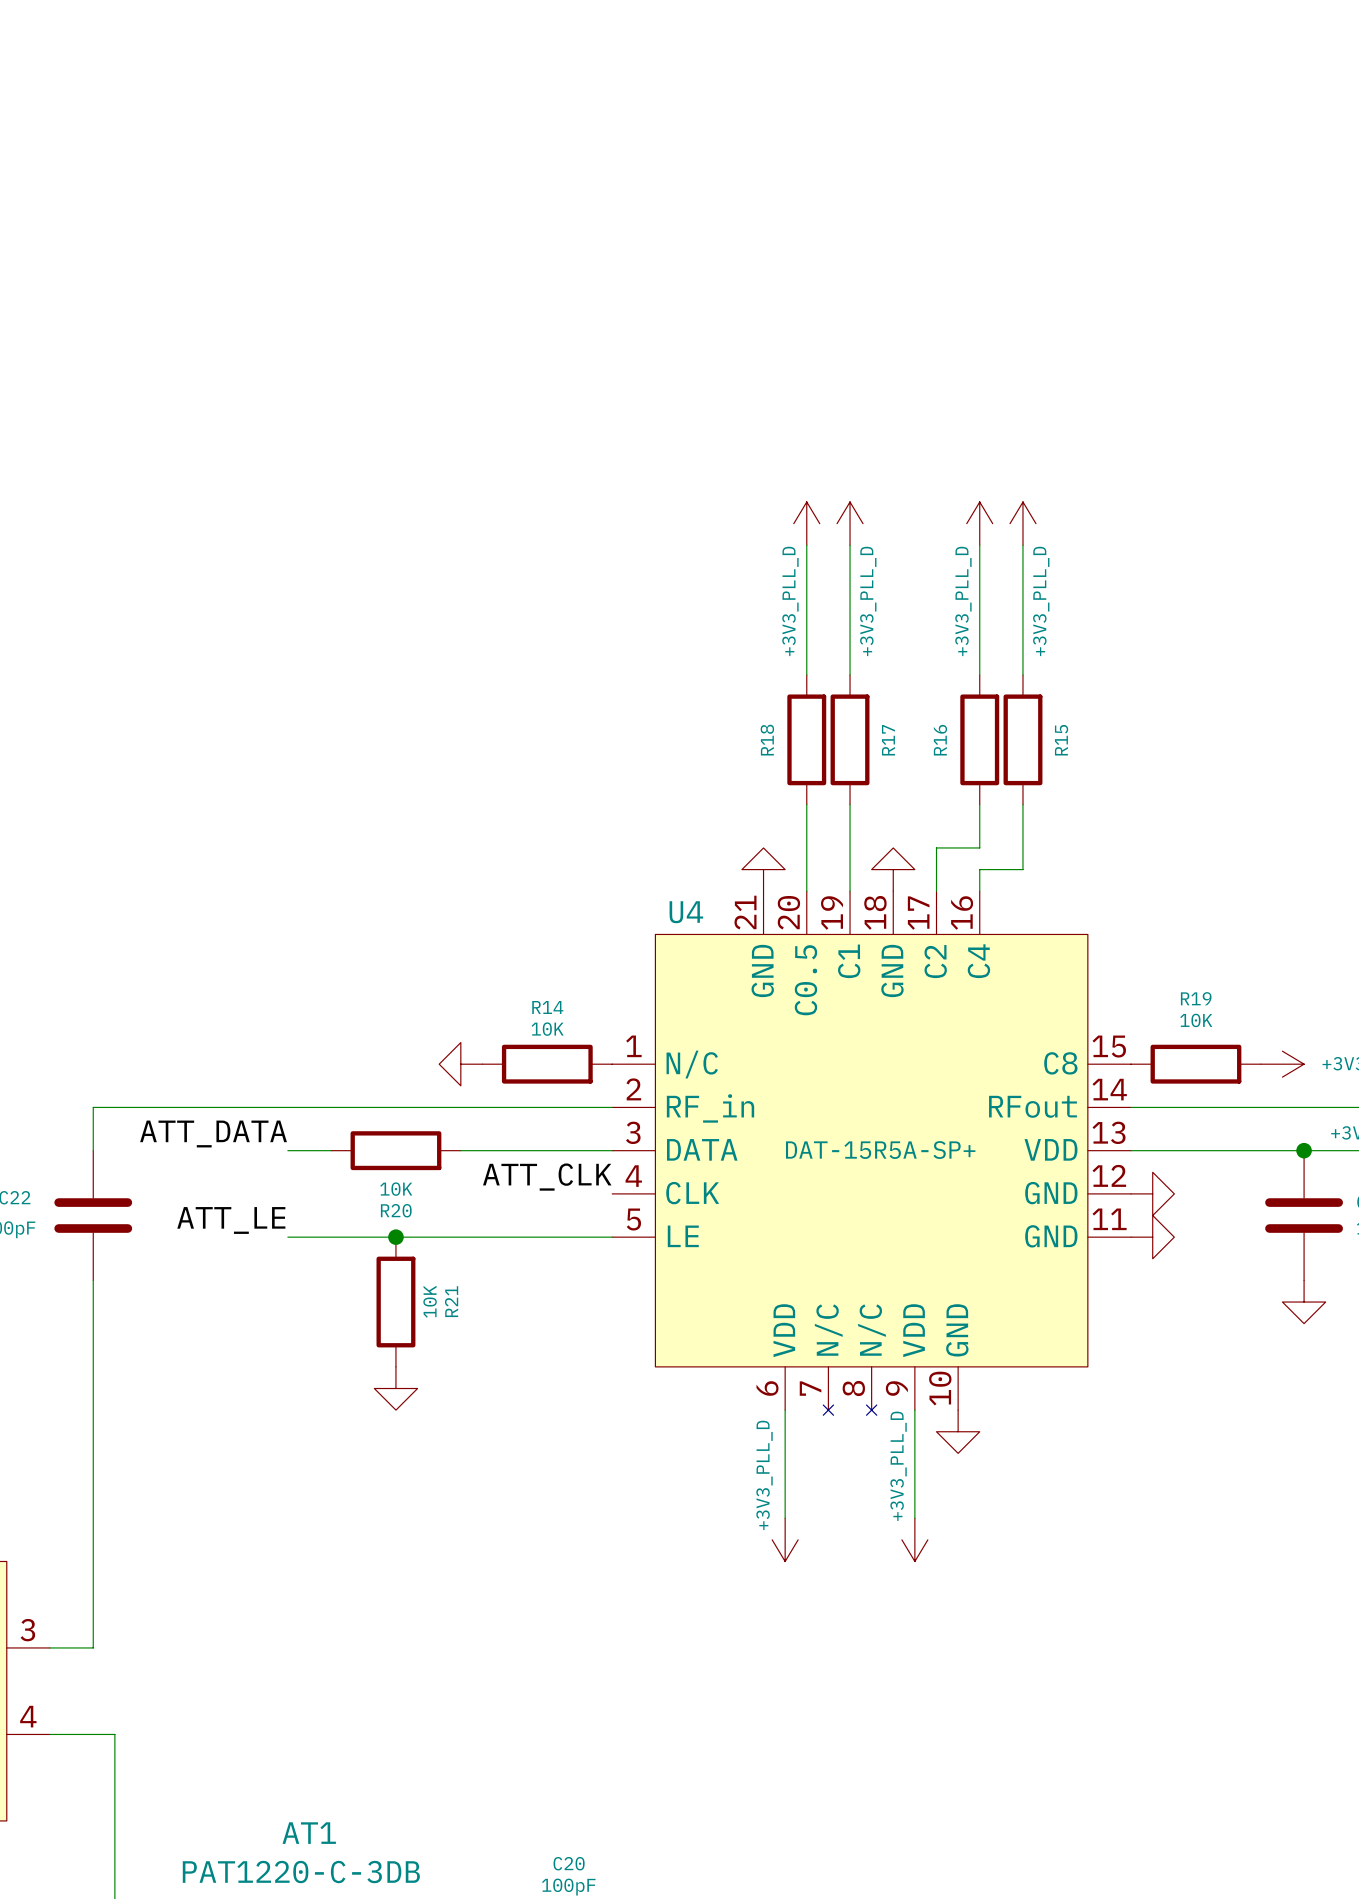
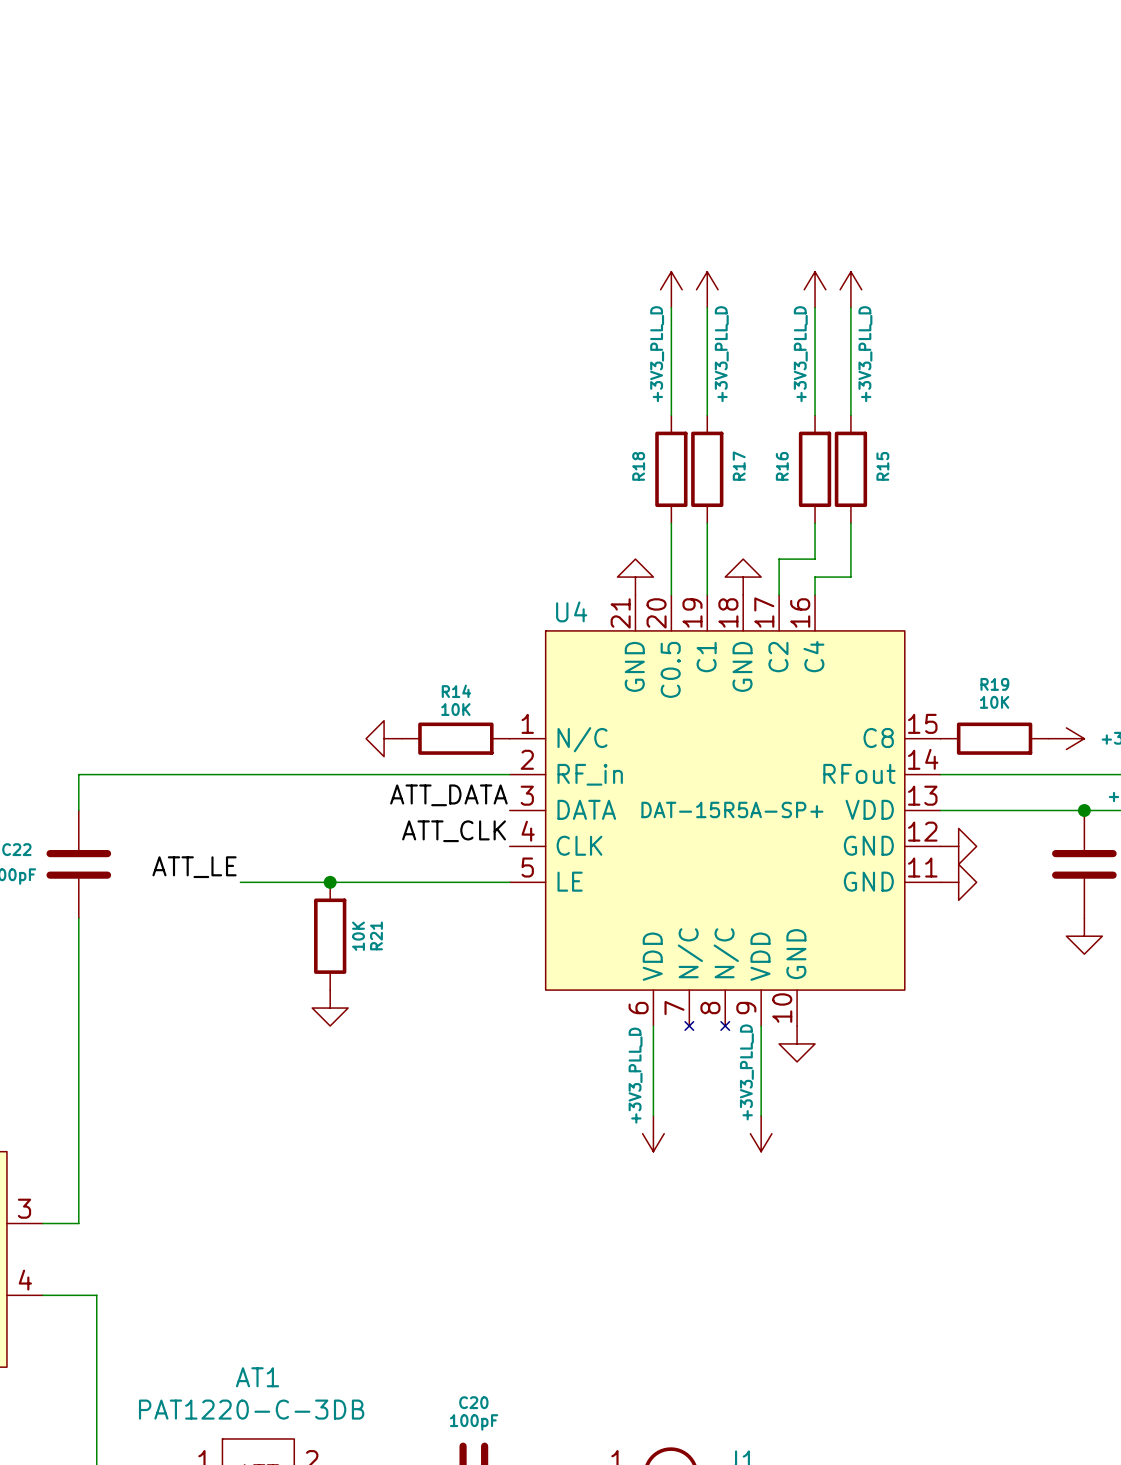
label position: ATT_DATA (213, 1133) -> ATT_DATA (448, 795)
wire: (287, 1150) (331, 1150) -> none
R20: 10K (395, 1150) -> none
wire: (460, 1150) (612, 1150) -> none

